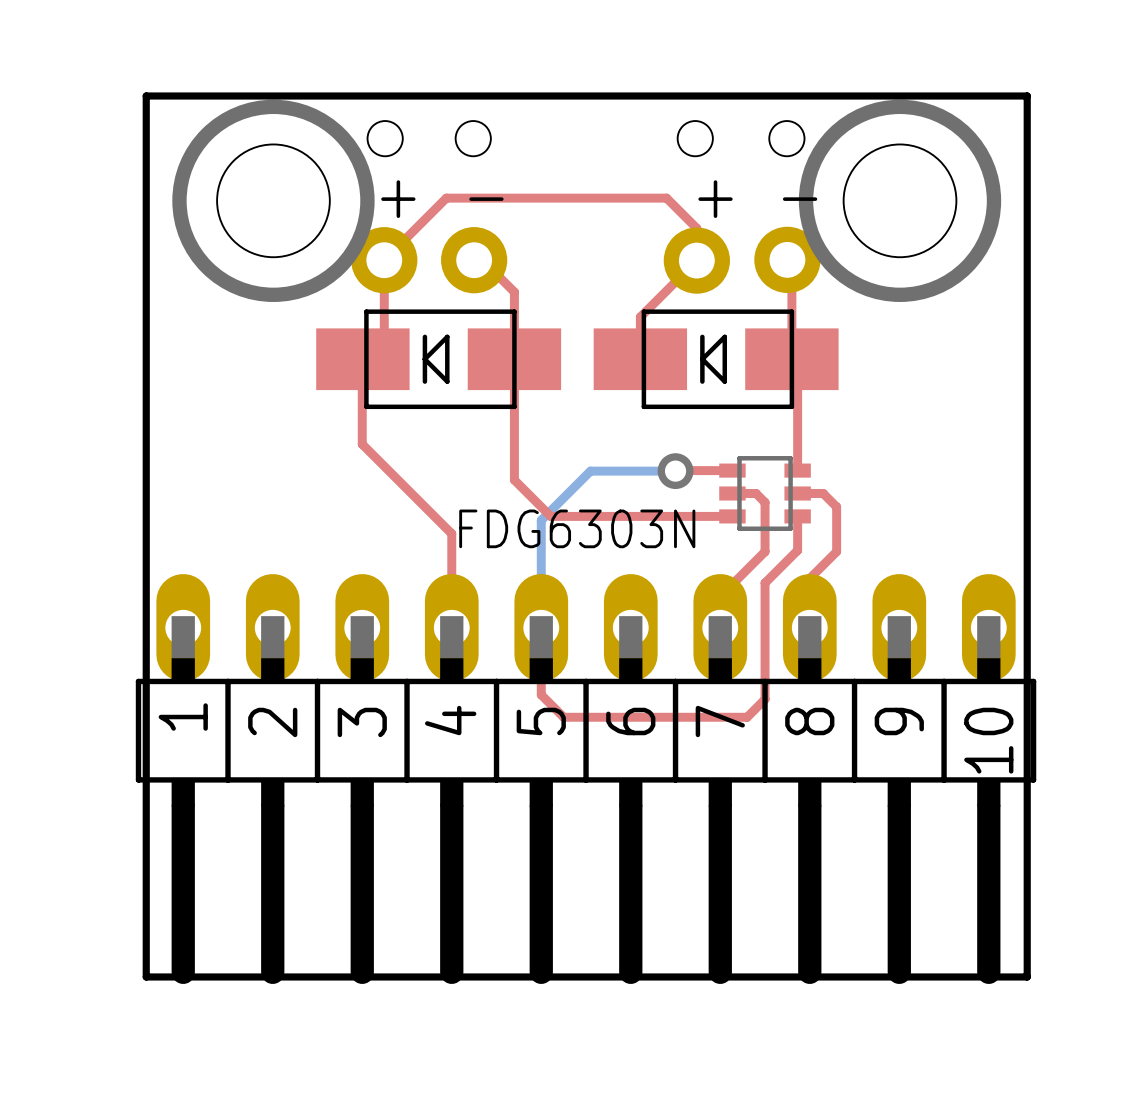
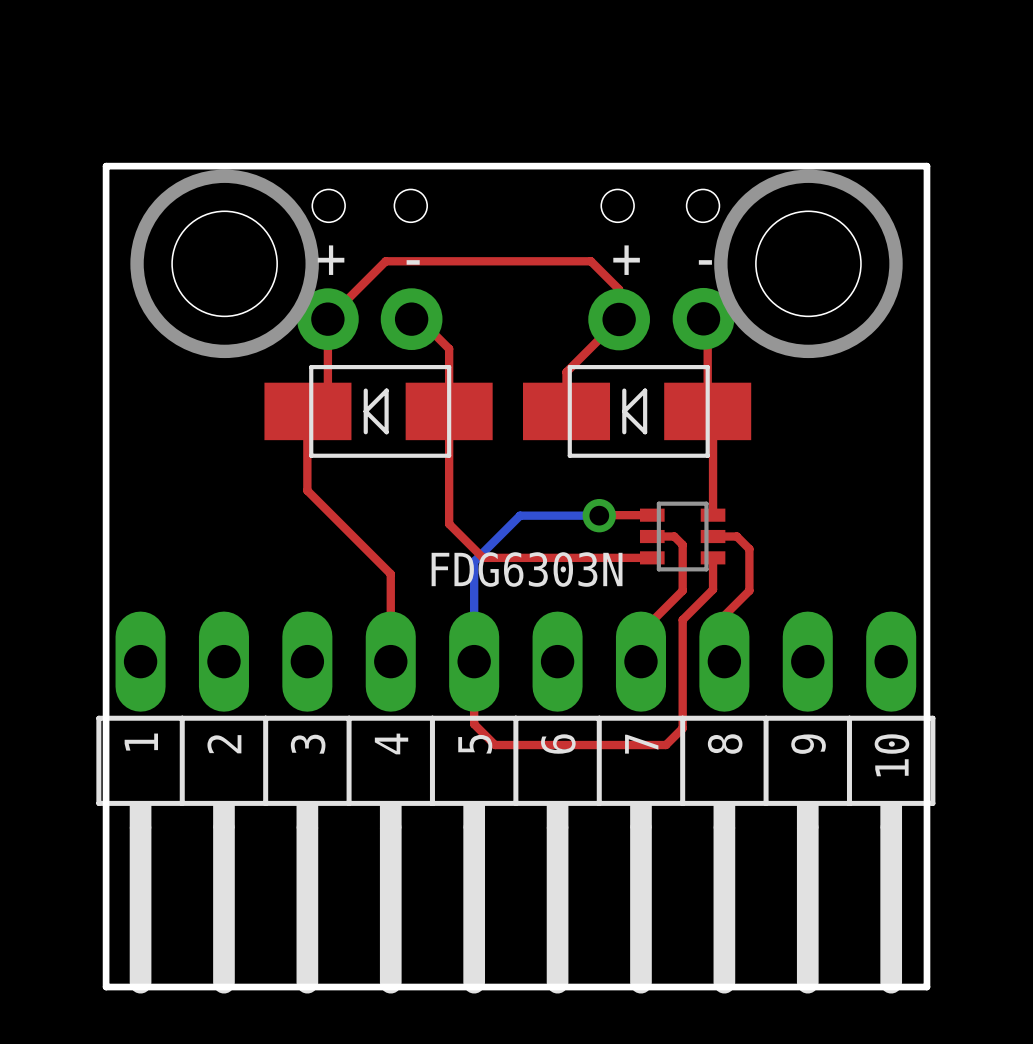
part footprint: [135, 574, 1037, 985] -> [96, 611, 936, 994]

